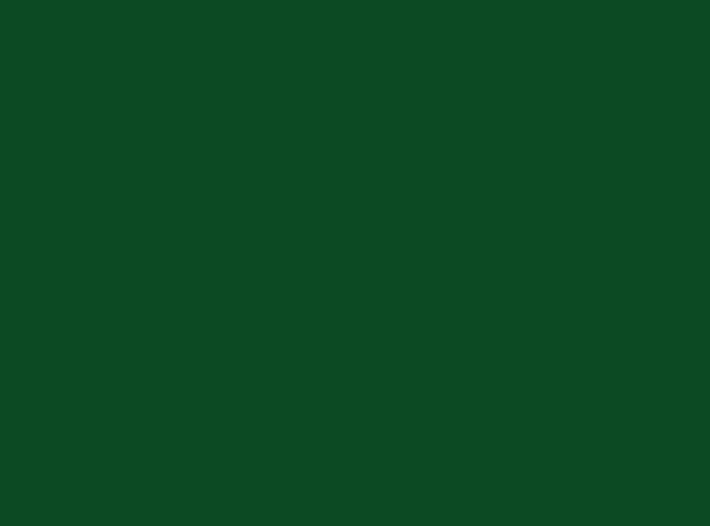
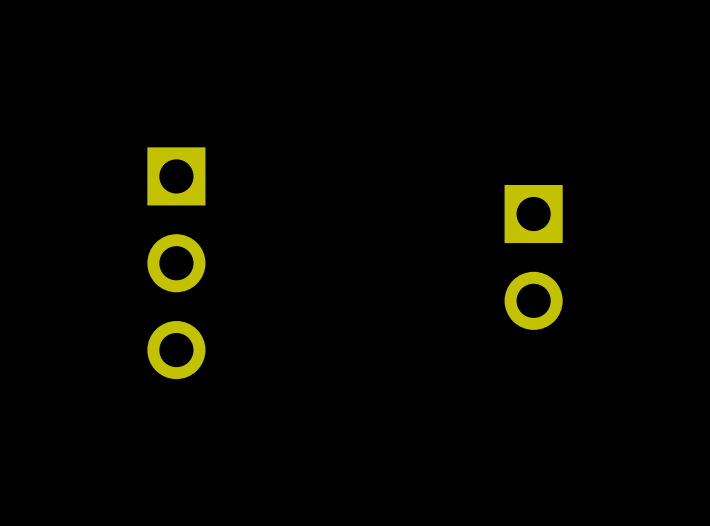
part: none -> (533, 257)
part: none -> (176, 263)

